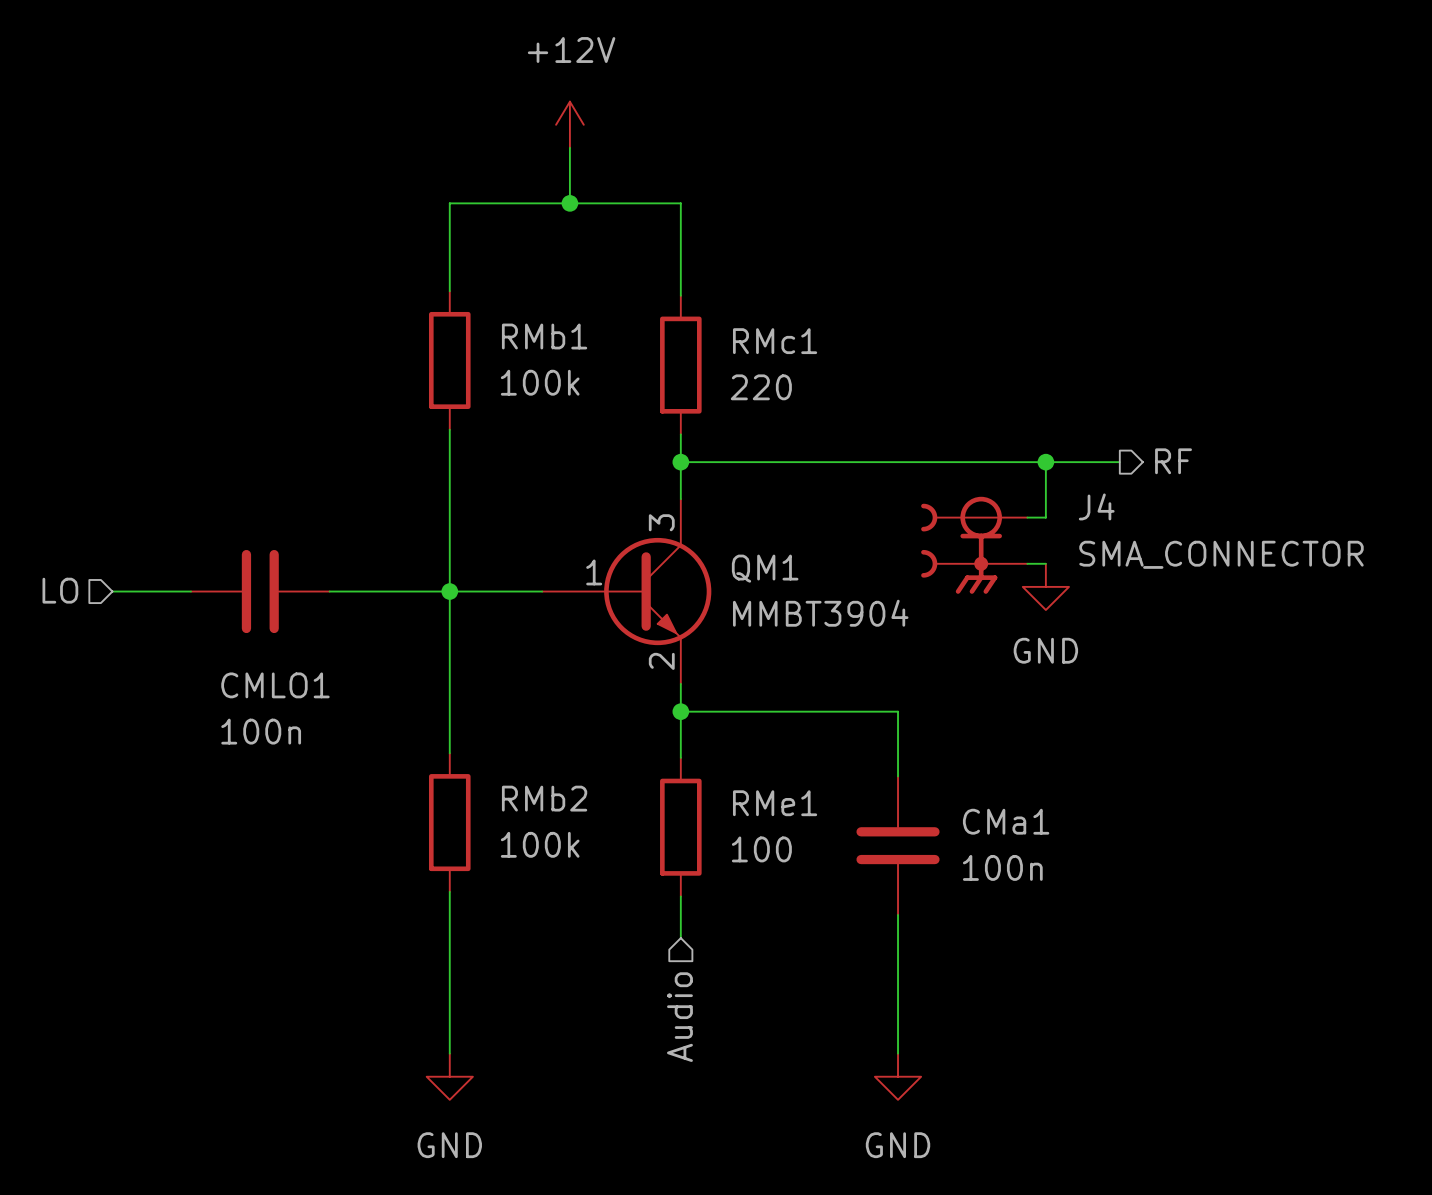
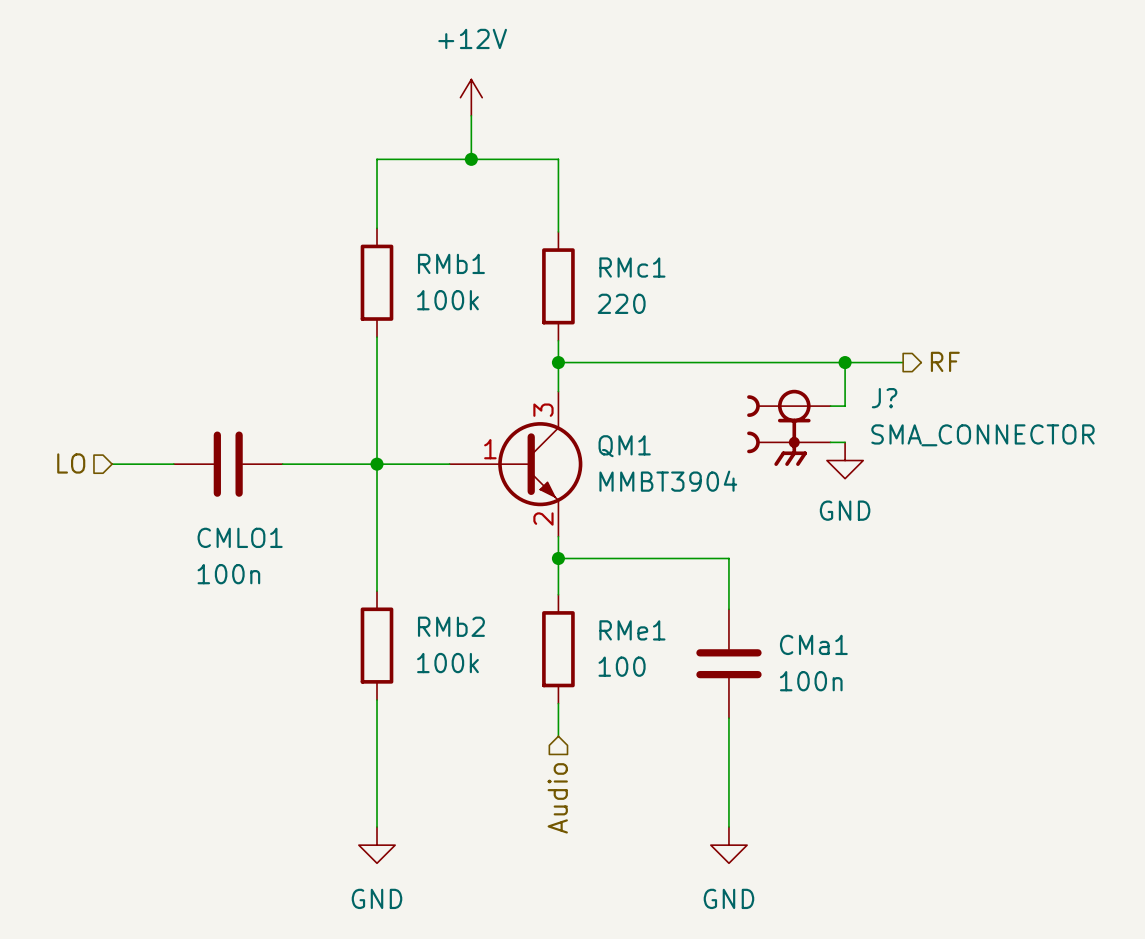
J4 name: J4 (1096, 506) -> J? (884, 398)

